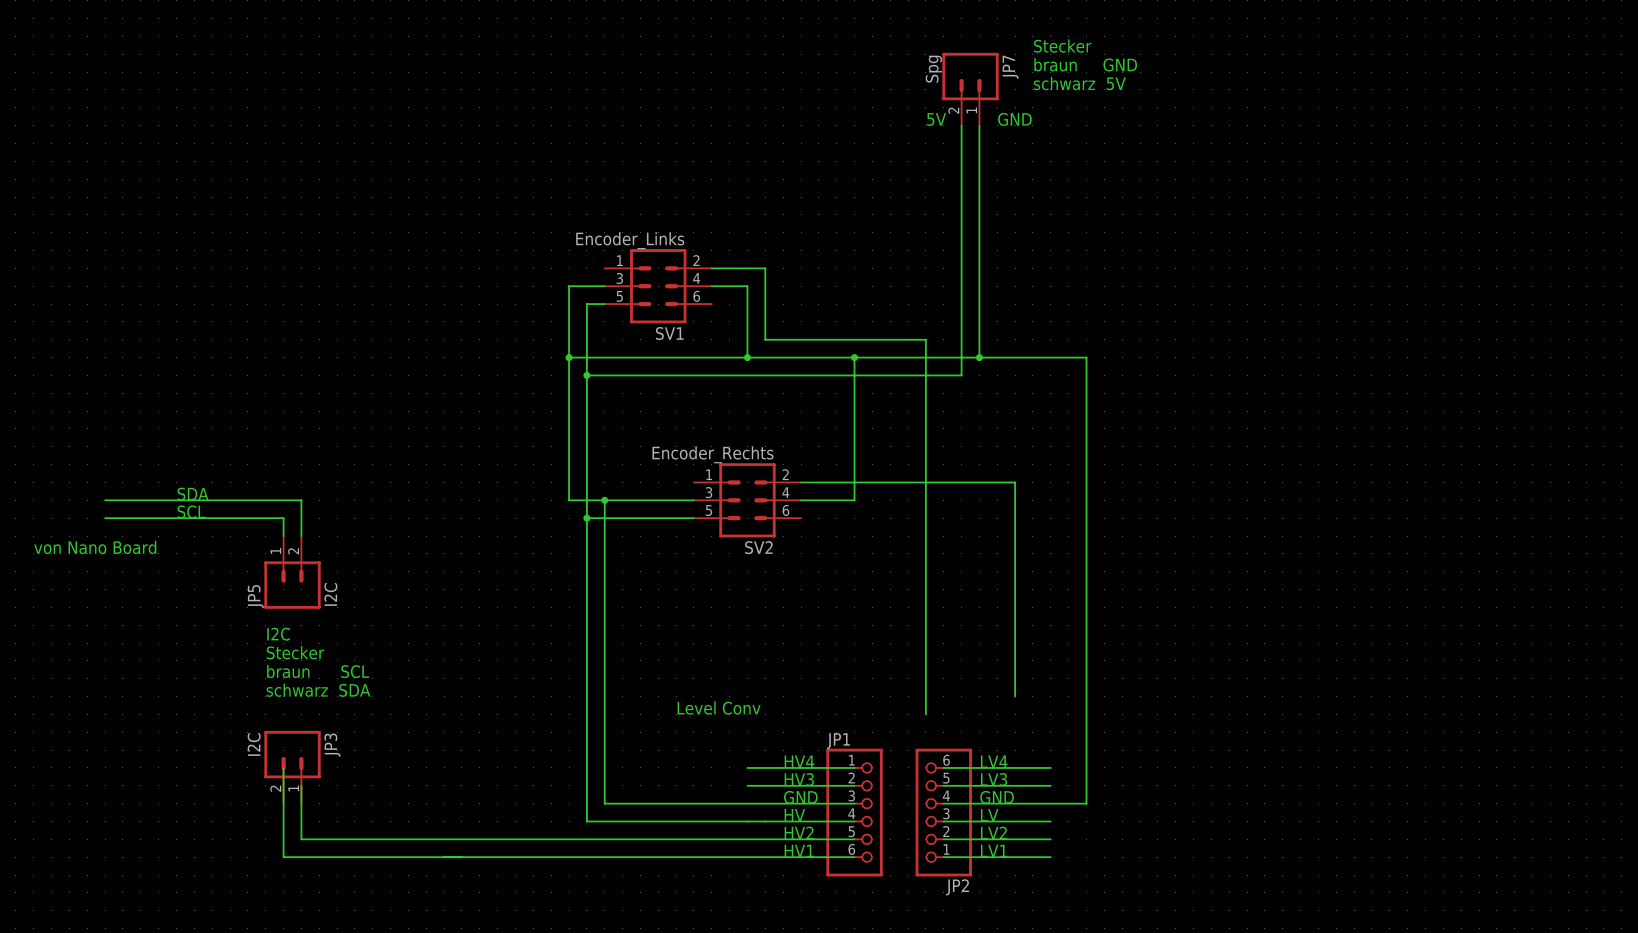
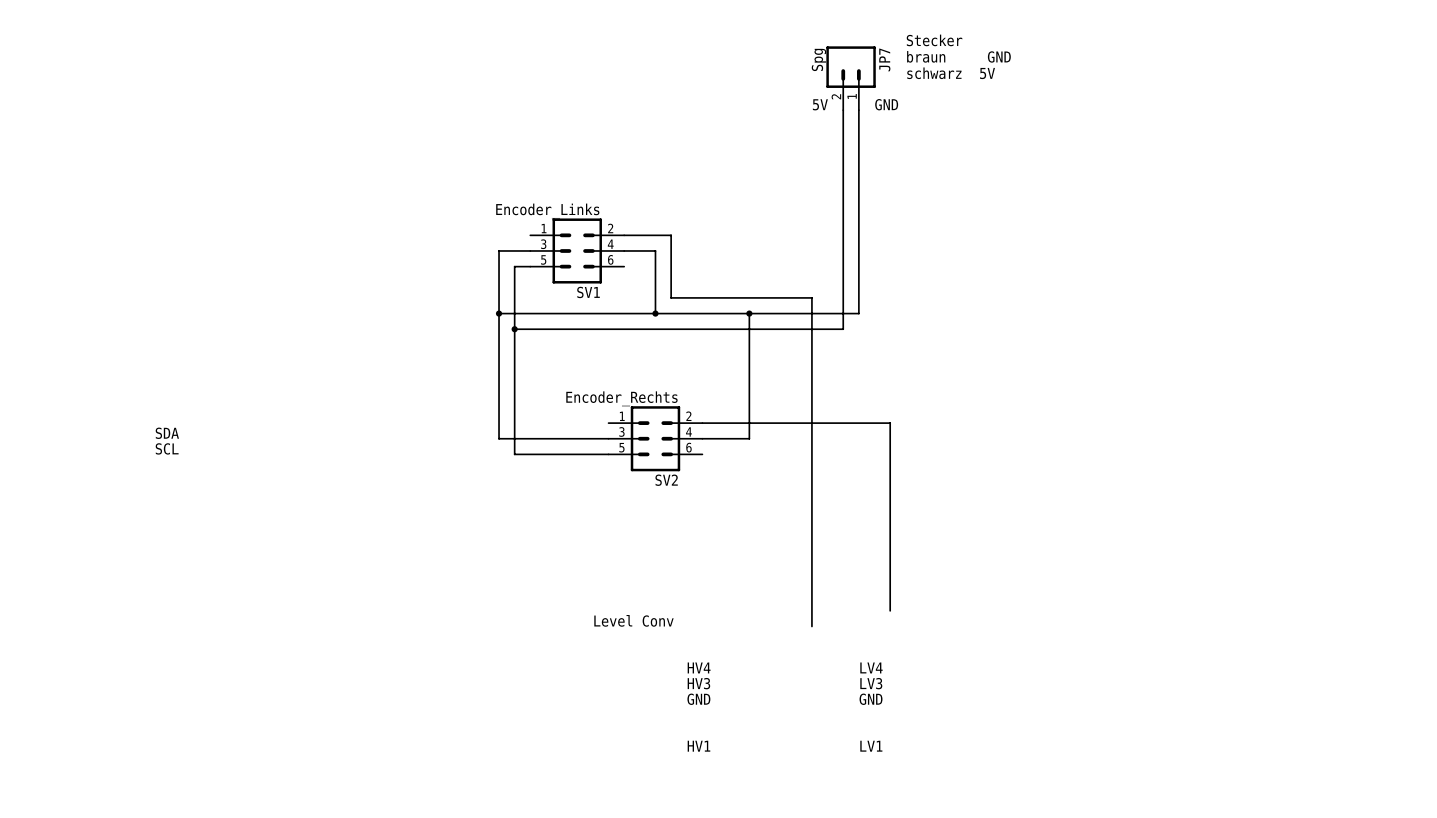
wire: (979, 357) (1086, 357) (1086, 803) (943, 803) -> none
junction: (979, 357) -> none
wire: (105, 500) (301, 500) (301, 536) -> none
wire: (604, 500) (604, 803) (854, 803) -> none
junction: (604, 500) -> none
wire: (105, 518) (283, 518) (283, 536) -> none
wire: (586, 518) (586, 821) (854, 821) -> none
junction: (586, 518) -> none
text: von Nano Board (95, 547) -> none
JP5: I2C (292, 572) -> none
text: I2C (278, 634) -> none
text: Stecker (295, 652) -> none
text: braun SCL (318, 671) -> none
text: schwarz SDA (318, 690) -> none
wire: (283, 767) (283, 857) (854, 857) -> none
JP3: I2C (292, 767) -> none
wire: (747, 767) (854, 767) -> none
wire: (943, 767) (1050, 767) -> none
wire: (301, 785) (301, 839) (854, 839) -> none
wire: (747, 785) (854, 785) -> none
wire: (943, 785) (1050, 785) -> none
JP1: (854, 812) -> none
JP2: (943, 812) -> none
text: HV (794, 815) -> none
text: LV (989, 815) -> none
wire: (943, 821) (1050, 821) -> none
text: HV2 (799, 832) -> none
text: LV2 (993, 832) -> none
wire: (943, 839) (1050, 839) -> none
wire: (943, 857) (1050, 857) -> none

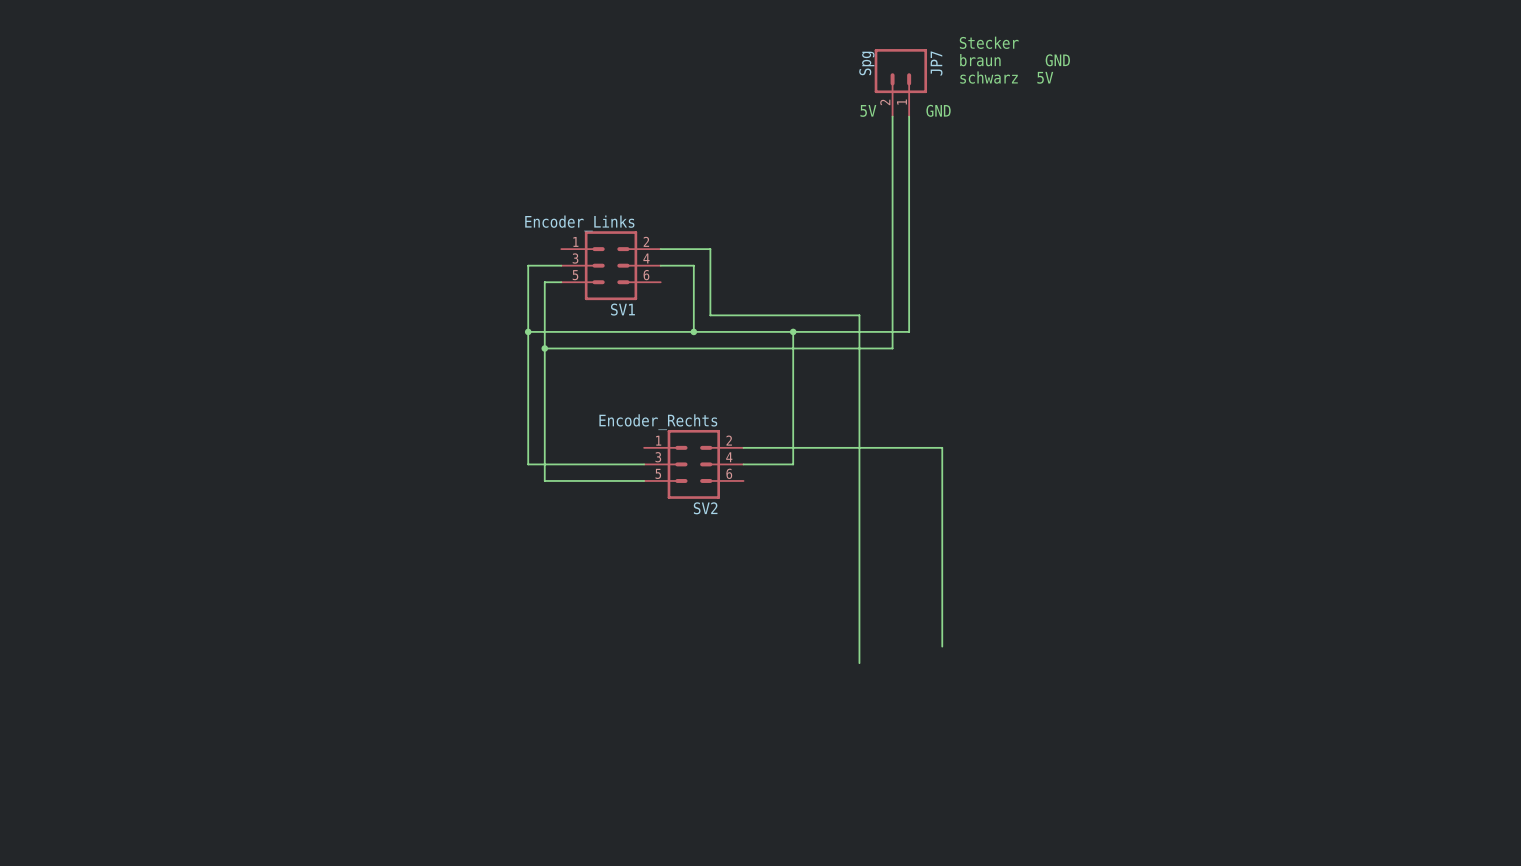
text: SDA (167, 433) -> none
text: SCL (167, 448) -> none
text: Level Conv (633, 620) -> none
text: HV4 (699, 667) -> none
text: LV4 (871, 667) -> none
text: HV3 (698, 683) -> none
text: LV3 (871, 683) -> none
text: GND (698, 699) -> none
text: GND (871, 699) -> none
text: HV1 (698, 746) -> none
text: LV1 (871, 746) -> none

